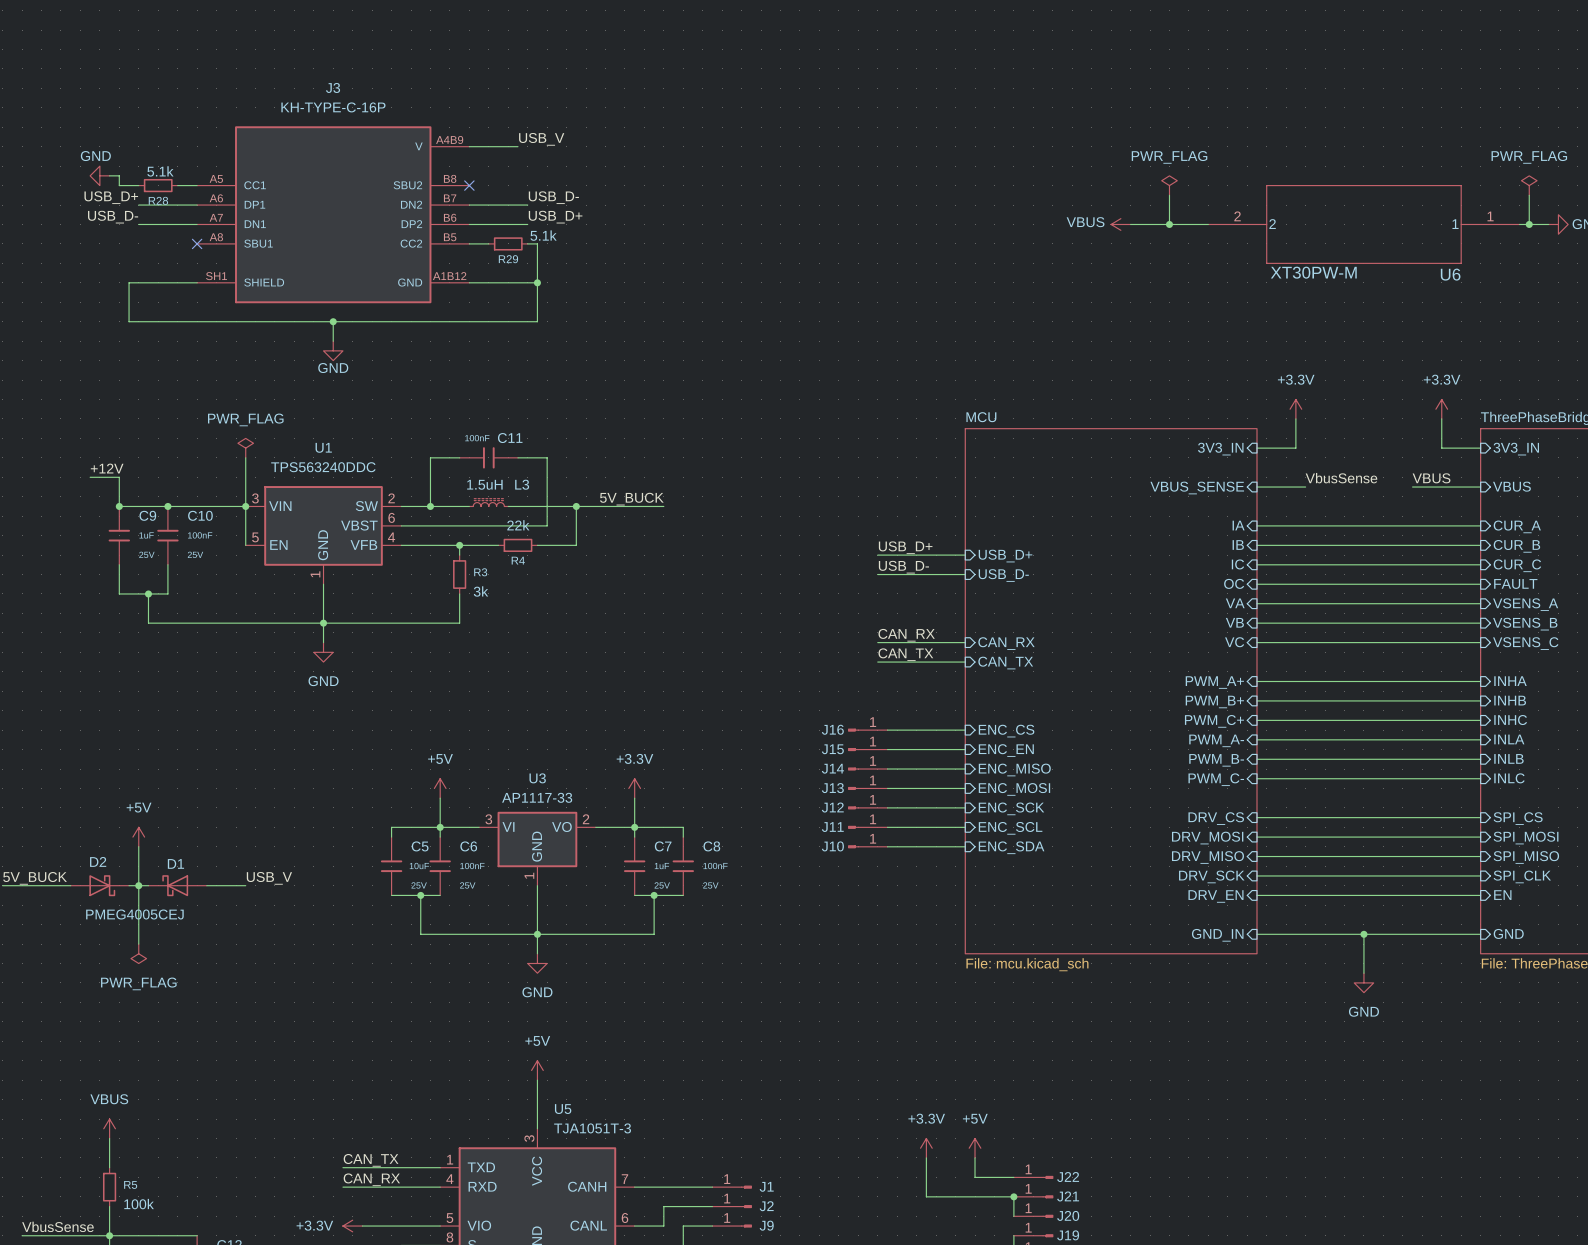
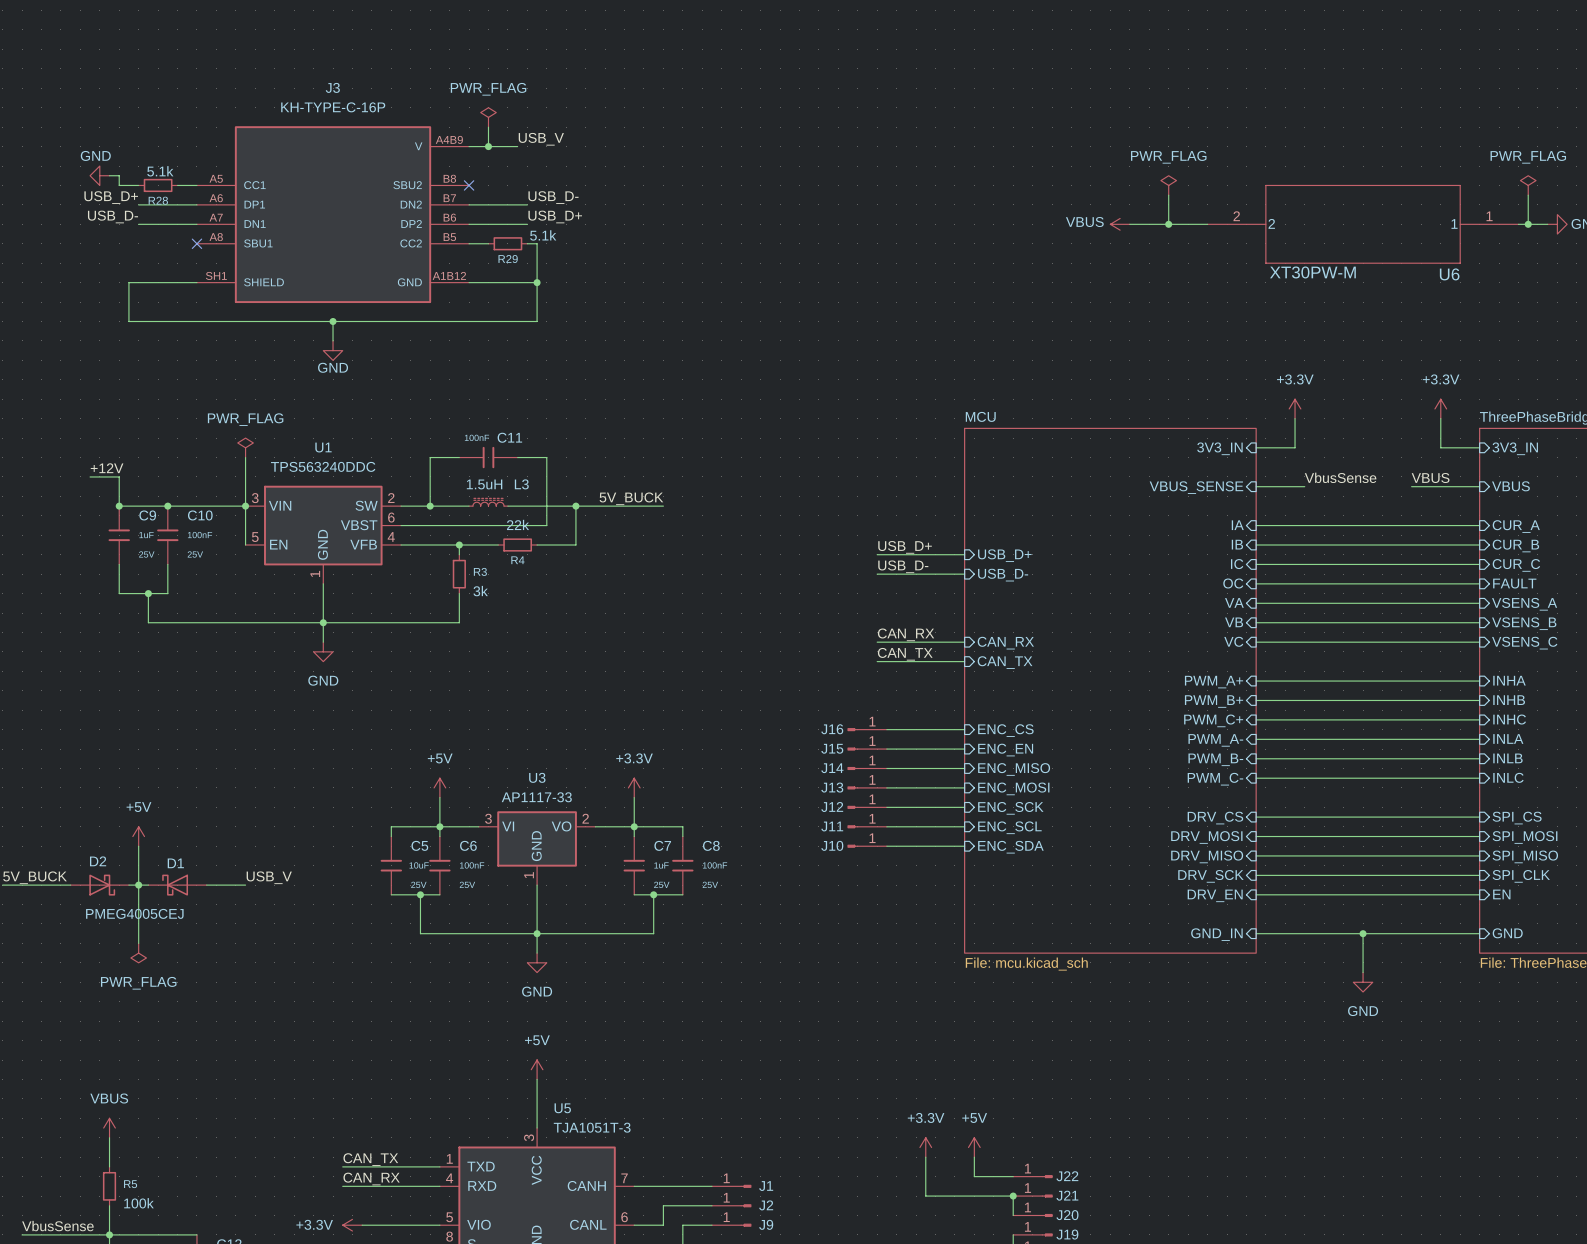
power symbol: none -> PWR_FLAG (488, 117)
wire: none -> (488, 127) (488, 146)
junction: none -> (488, 146)

